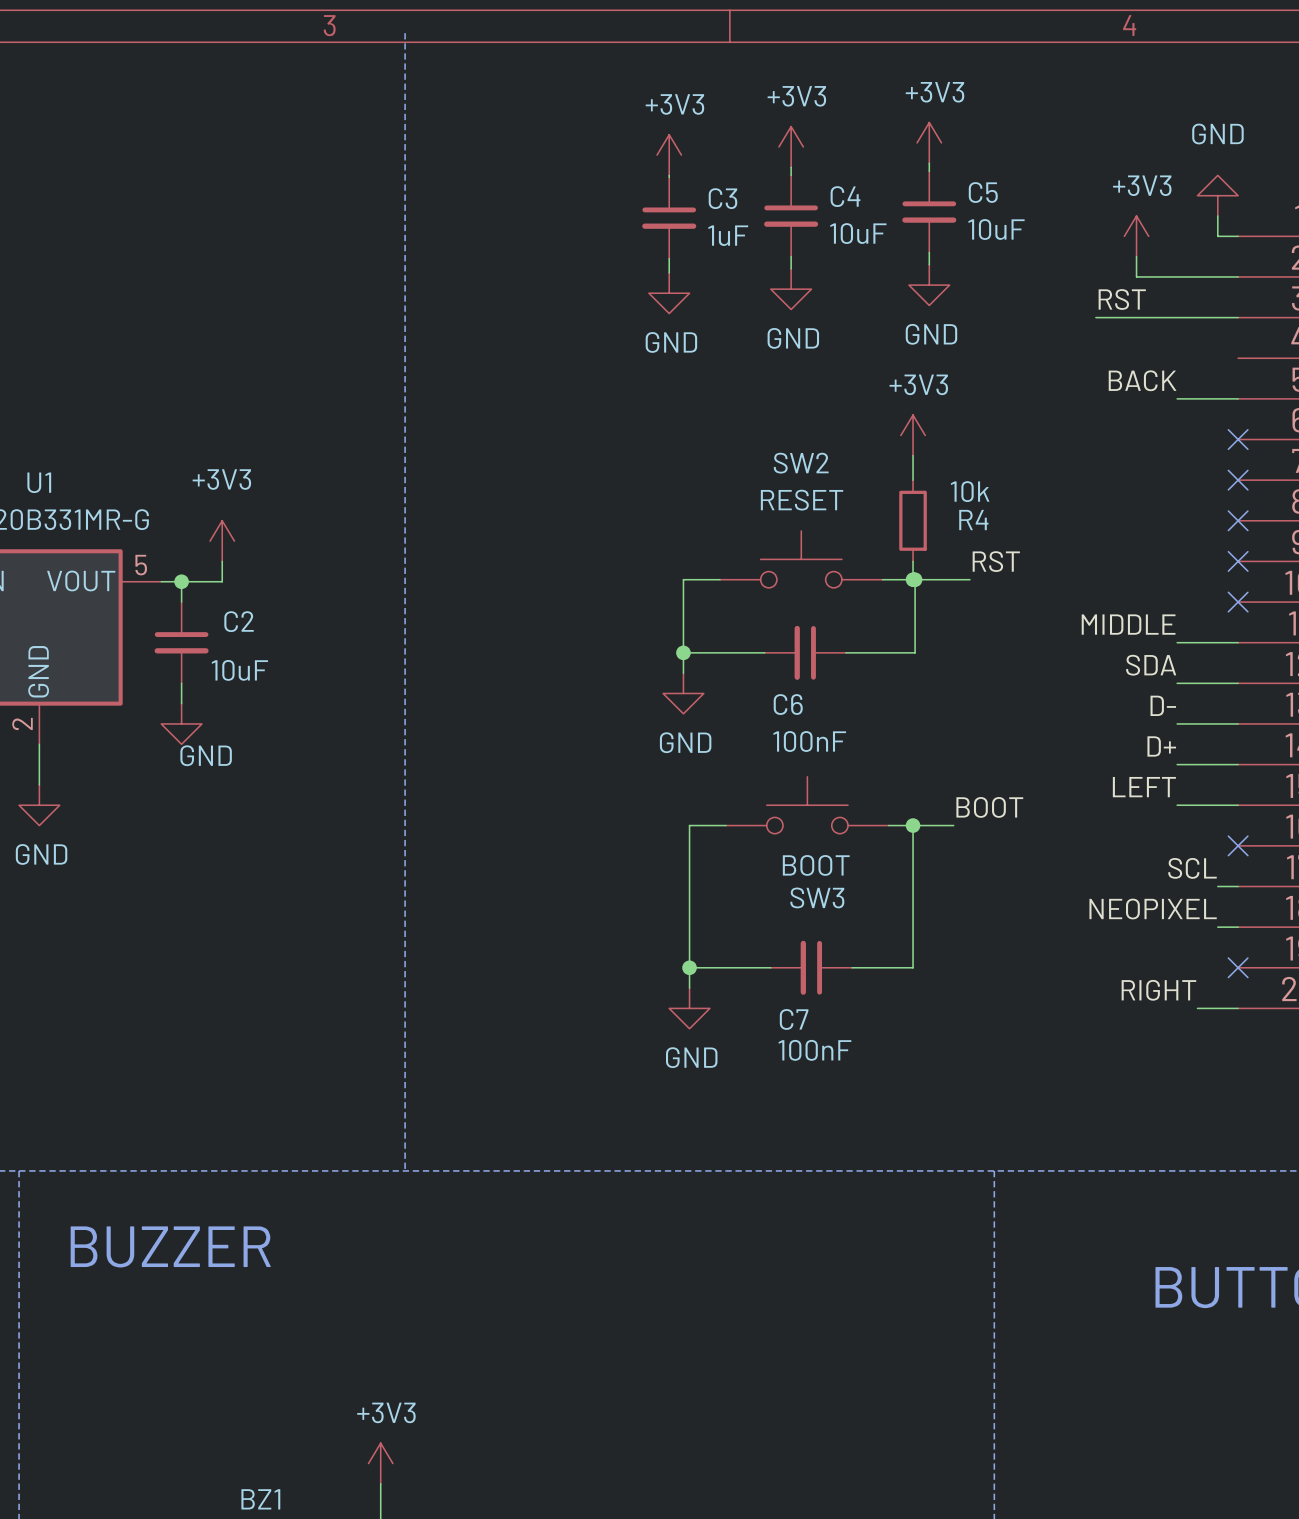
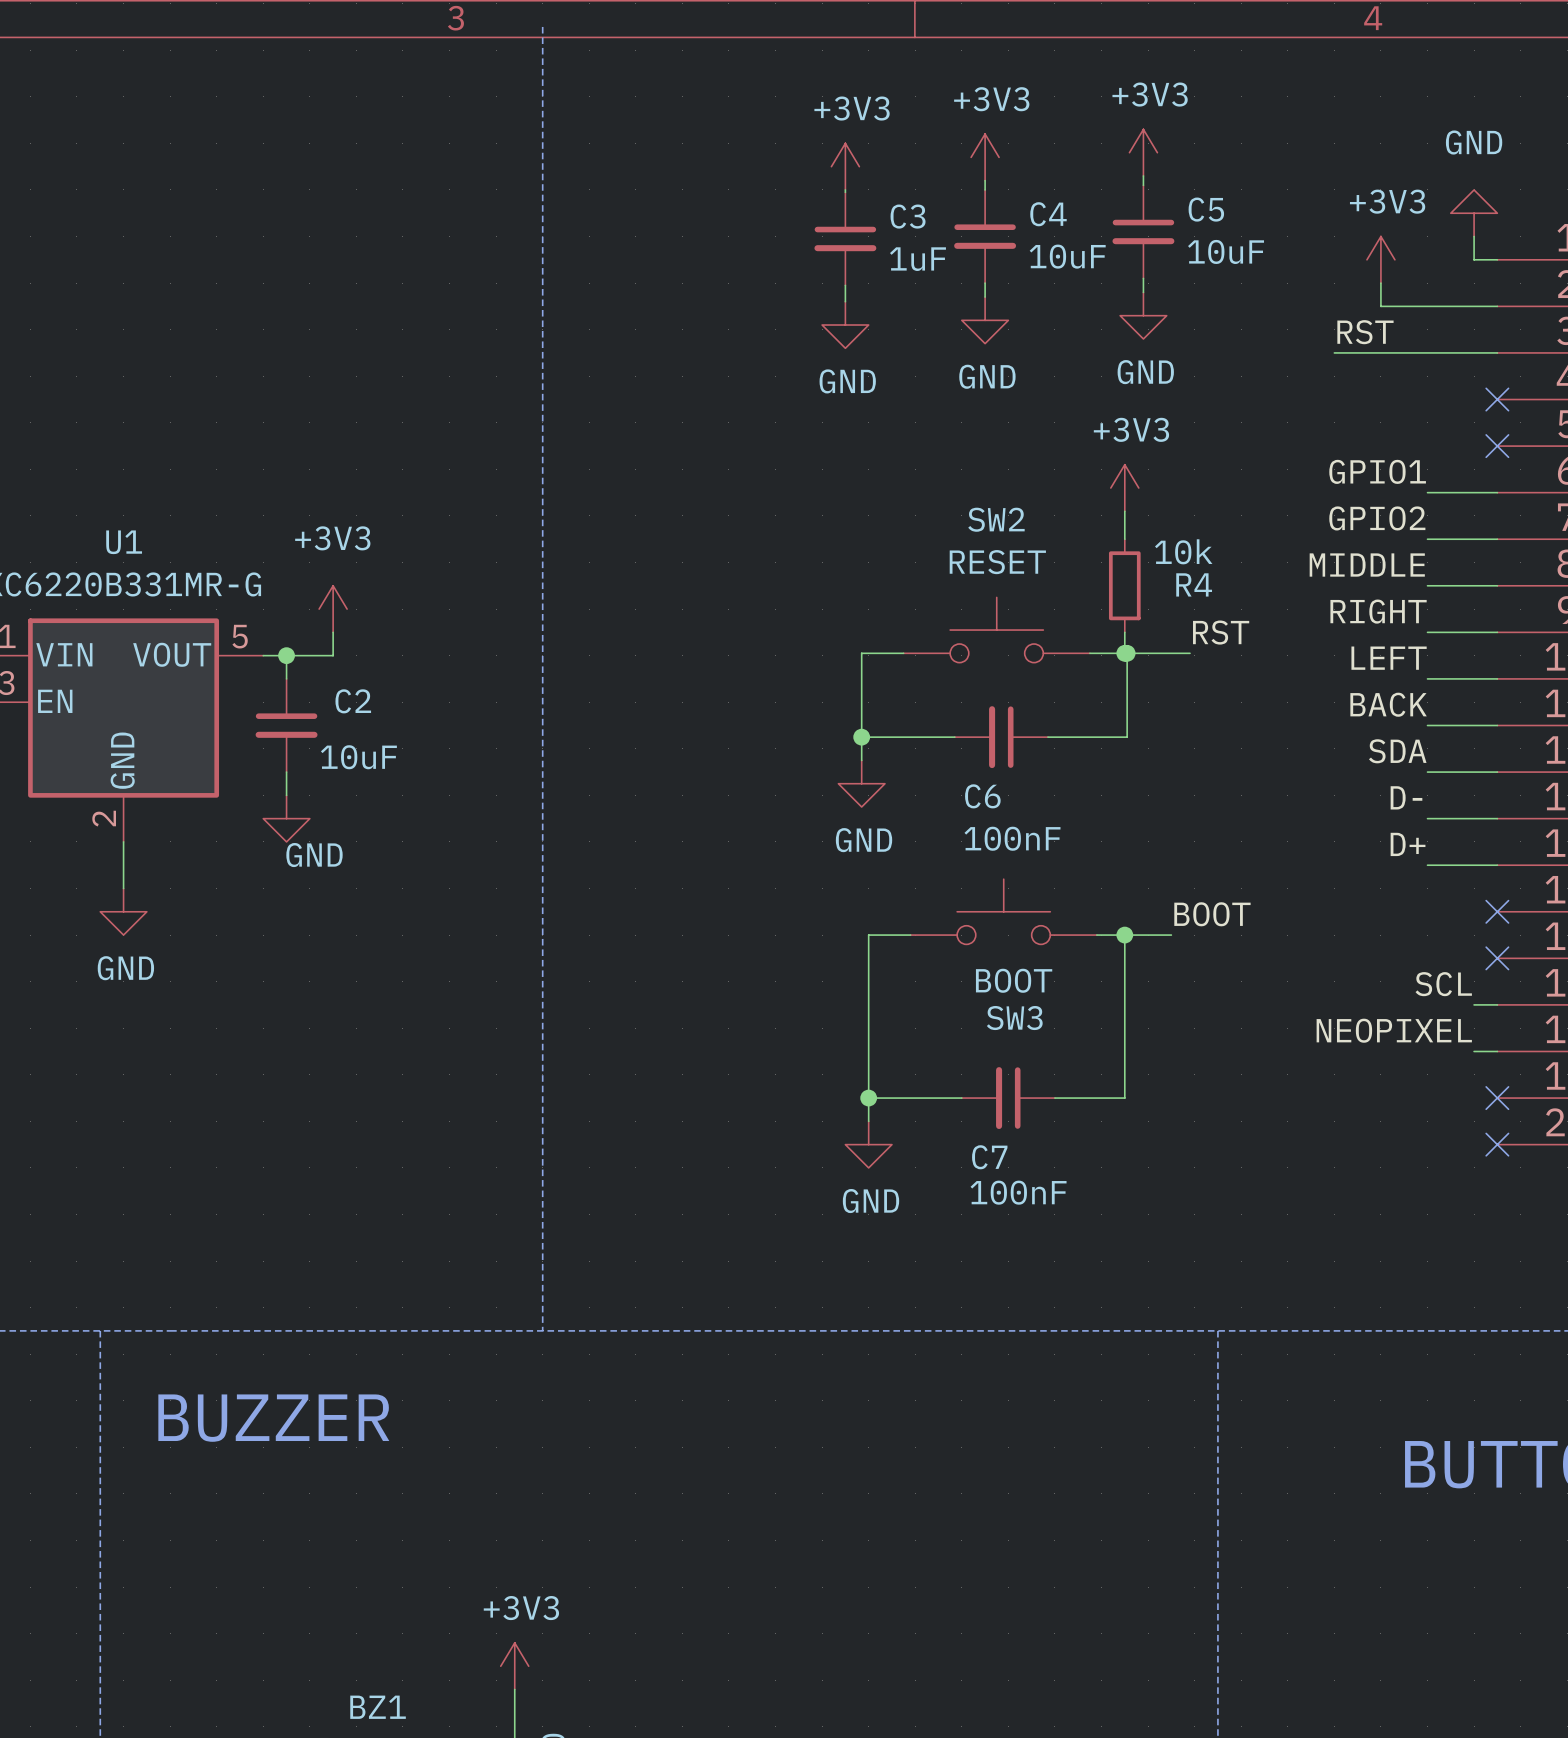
no-connect mark: none -> (1497, 399)
label: BACK (1142, 380) -> none
wire: (1177, 398) (1238, 398) -> (1427, 492) (1497, 492)
no-connect mark: none -> (1497, 446)
label: none -> GPIO1 (1377, 471)
no-connect mark: (1238, 439) -> none
label: none -> GPIO2 (1377, 518)
wire: none -> (1427, 539) (1497, 539)
no-connect mark: (1238, 480) -> none
label: none -> MIDDLE (1367, 565)
wire: none -> (1427, 585) (1497, 585)
no-connect mark: (1238, 520) -> none
label: none -> RIGHT (1378, 611)
wire: none -> (1427, 632) (1497, 632)
no-connect mark: (1238, 561) -> none
no-connect mark: (1238, 602) -> none
label: MIDDLE (1128, 624) -> BACK (1388, 704)
label position: LEFT (1144, 787) -> LEFT (1389, 658)
wire: (1177, 805) (1238, 805) -> (1427, 678) (1497, 678)
no-connect mark: none -> (1497, 911)
label: RIGHT (1158, 990) -> none
wire: (1197, 1008) (1238, 1008) -> none
no-connect mark: none -> (1497, 1144)

